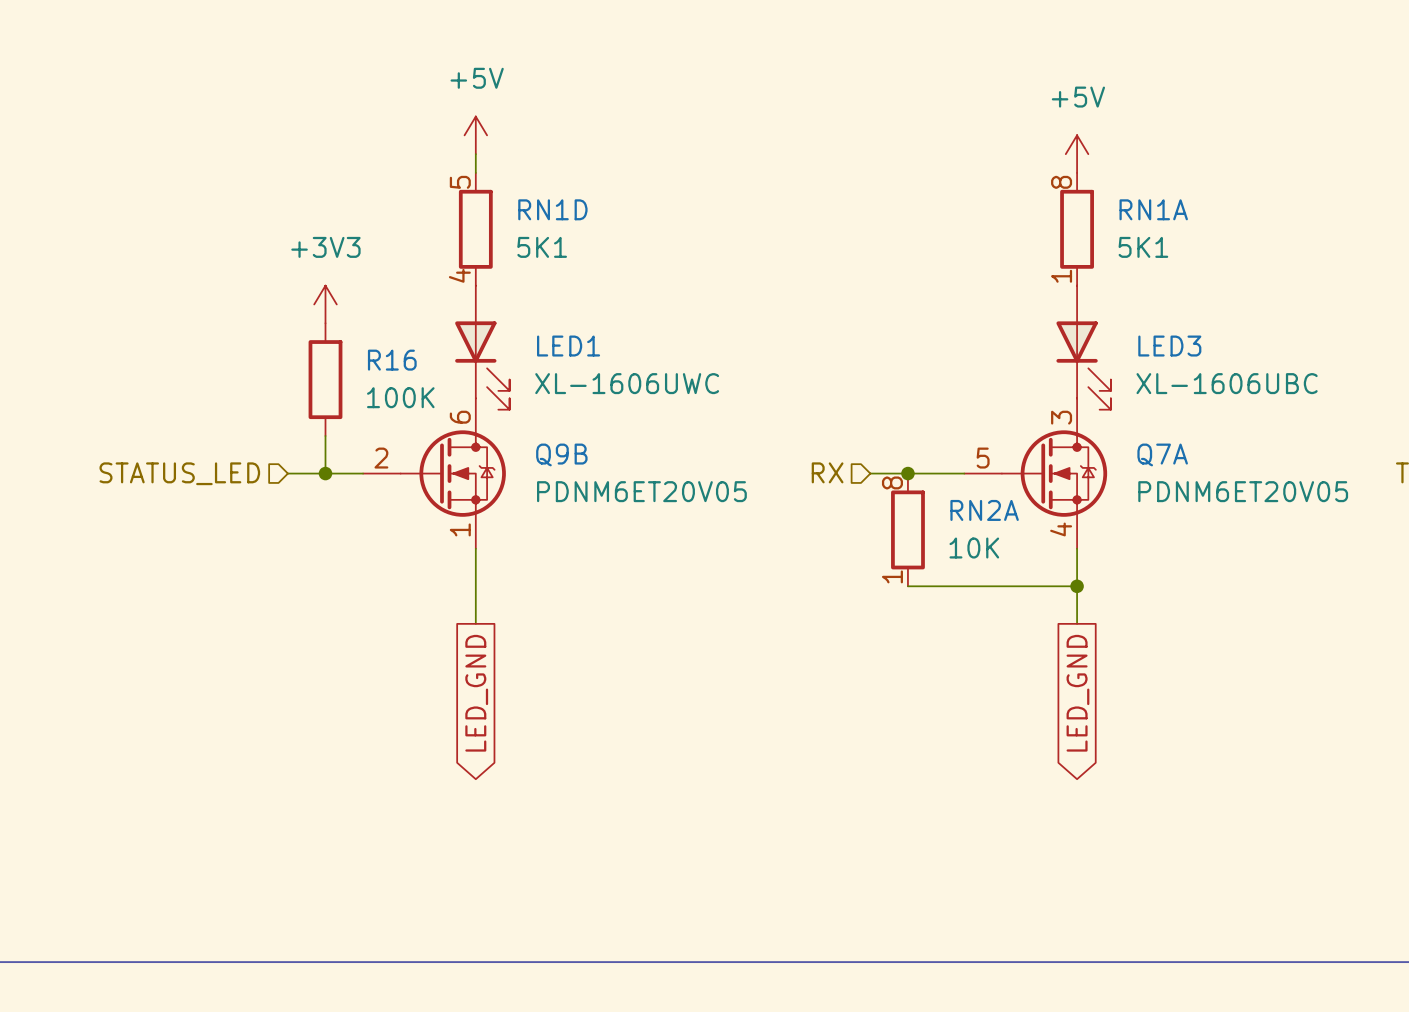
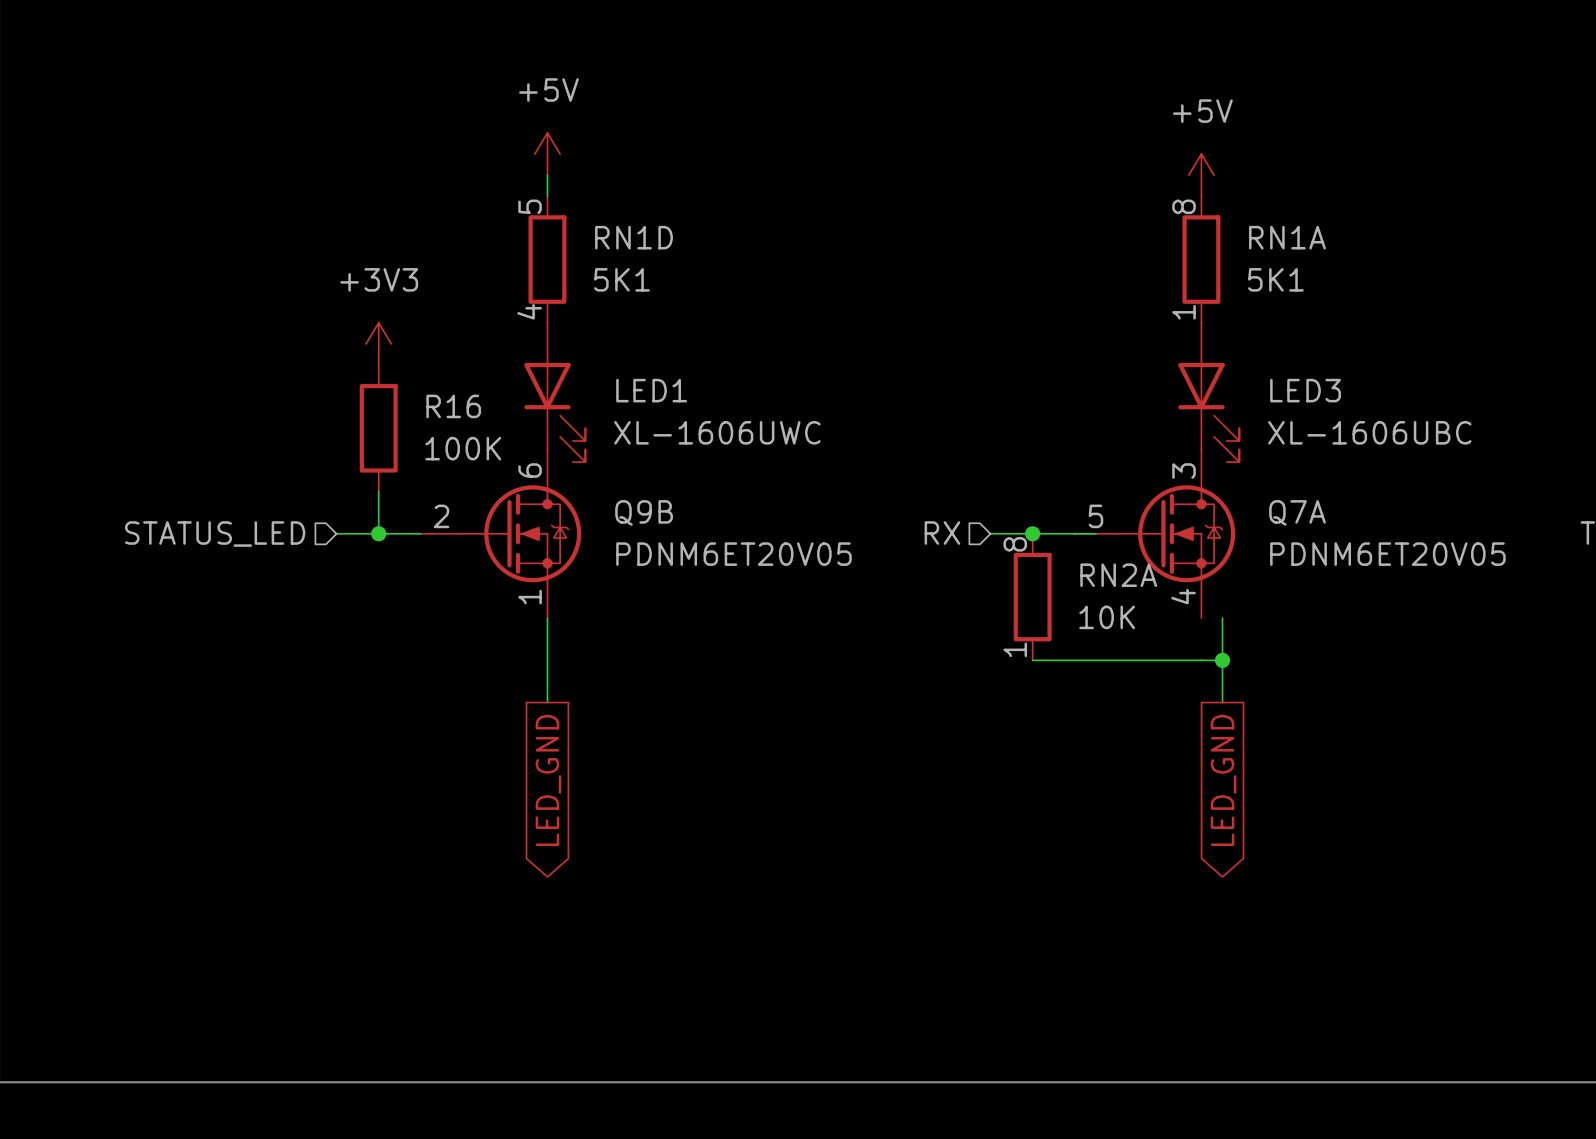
power symbol position: +5V (1077, 154) -> +5V (1201, 175)
RN1A position: (1077, 229) -> (1201, 259)
LED3 position: (1083, 347) -> (1208, 392)
Q7A position: (1035, 473) -> (1155, 533)

